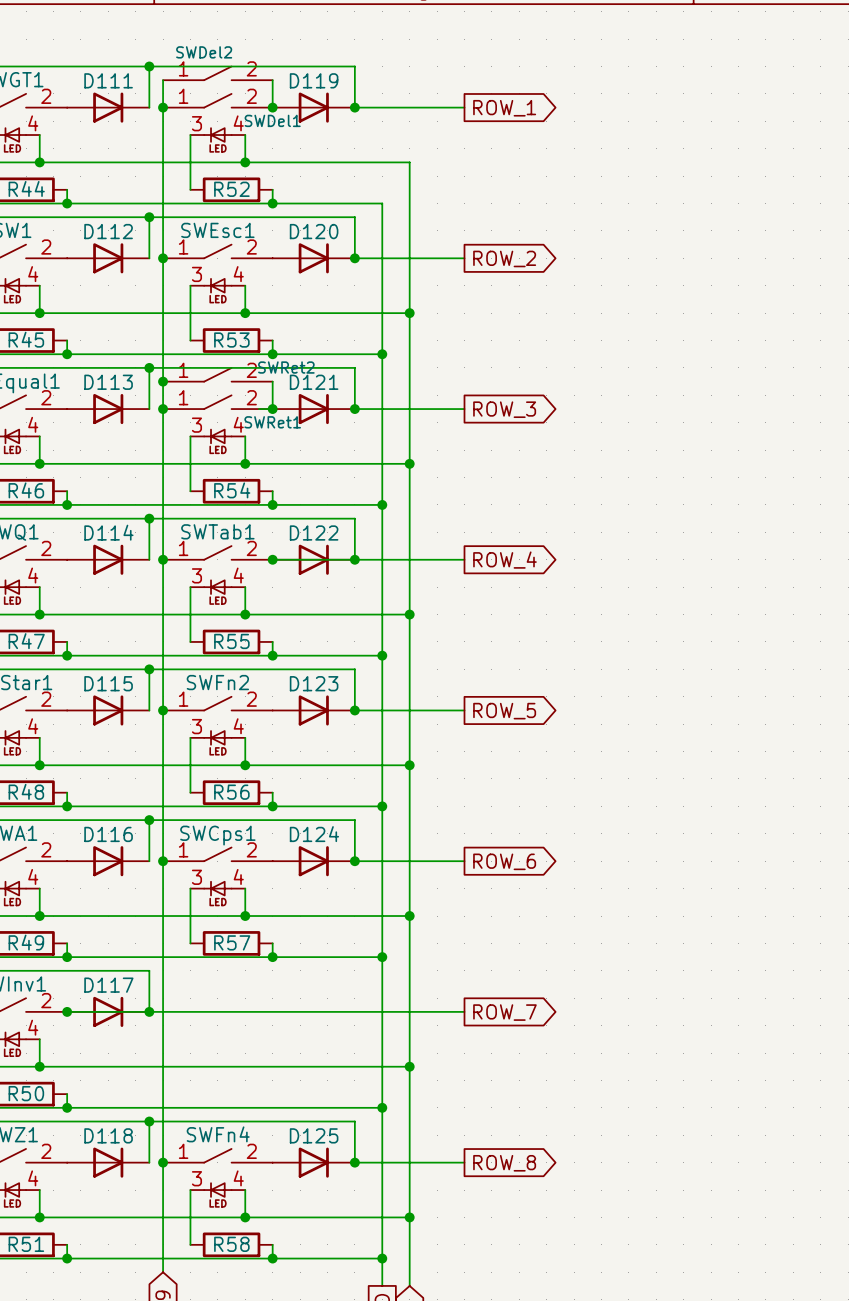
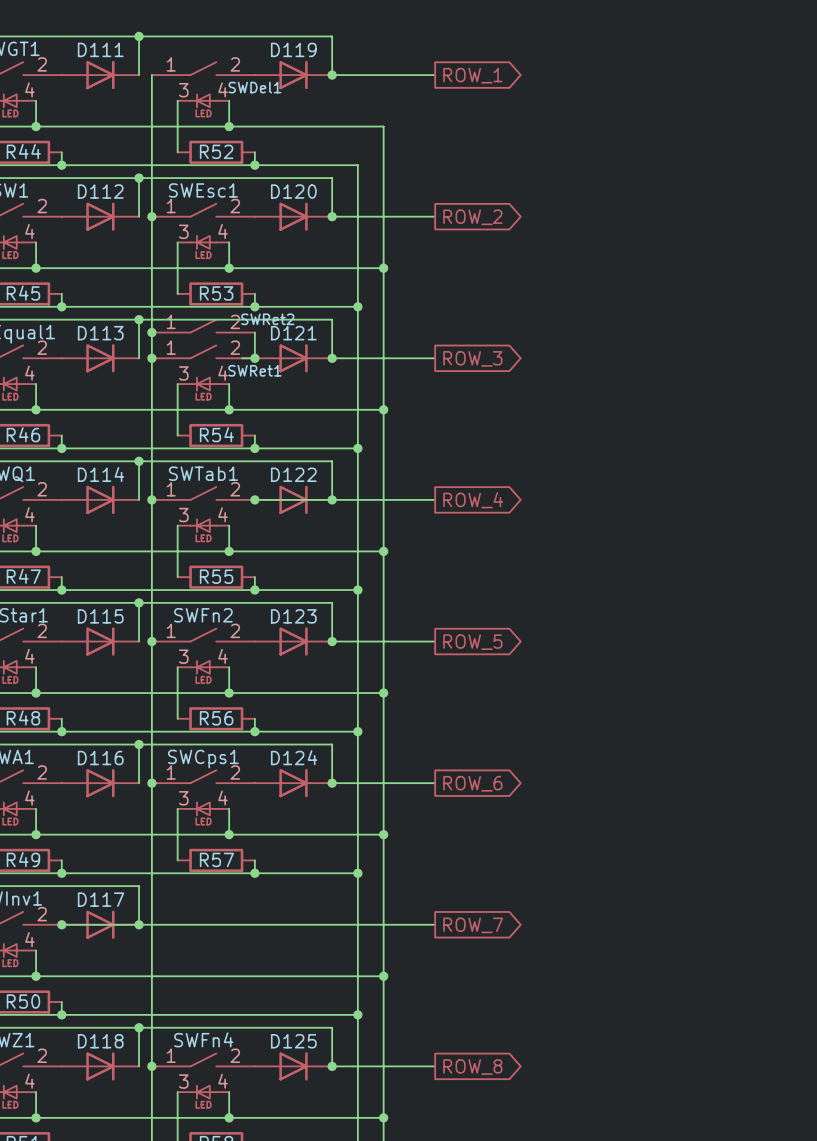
SWDel2: (217, 73) -> none
wire: (163, 80) (163, 107) -> none
wire: (272, 80) (272, 107) -> none
junction: (163, 107) -> none
junction: (272, 107) -> none

